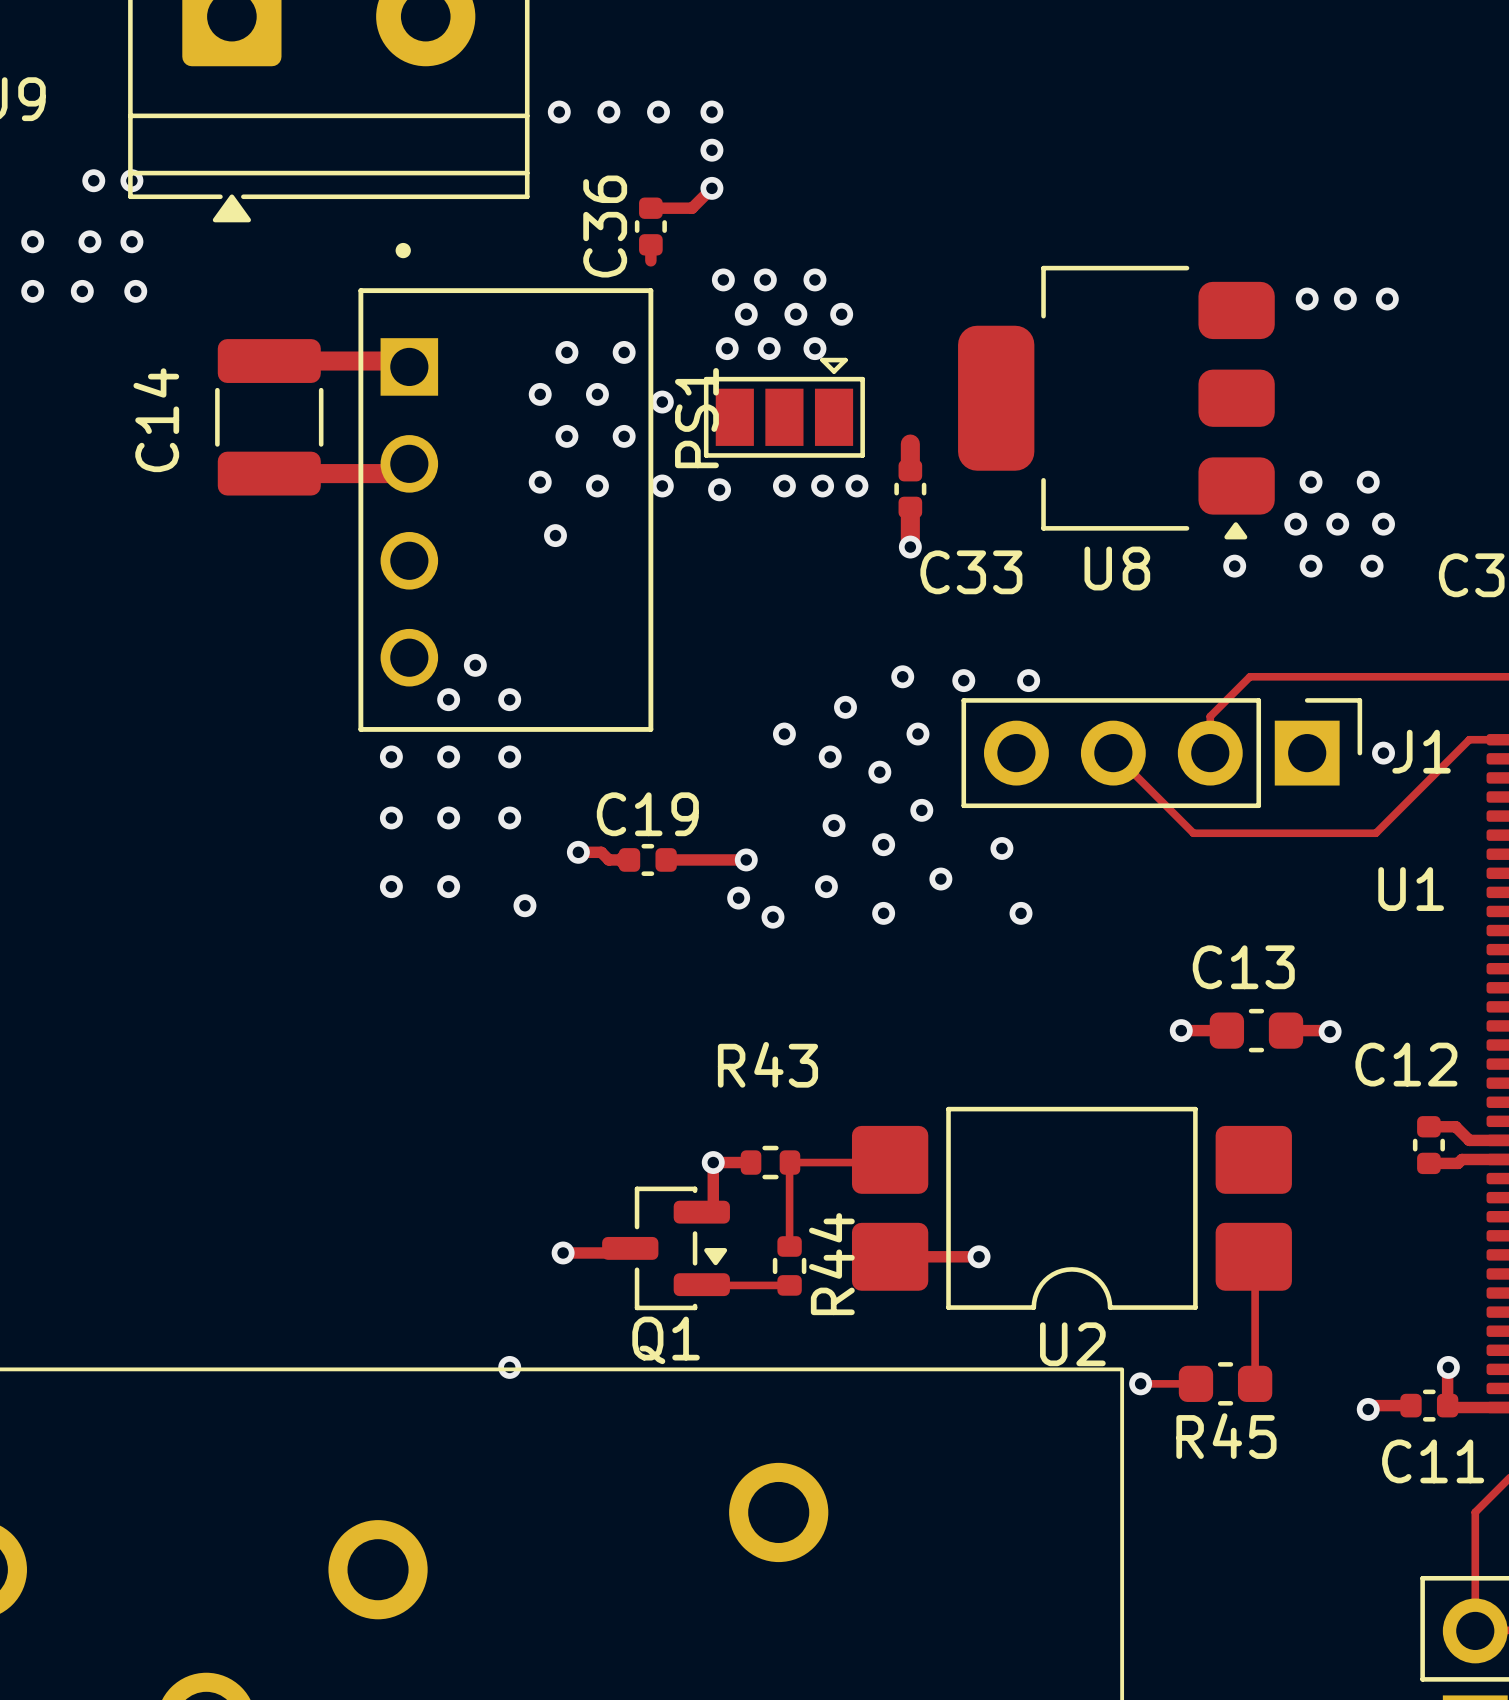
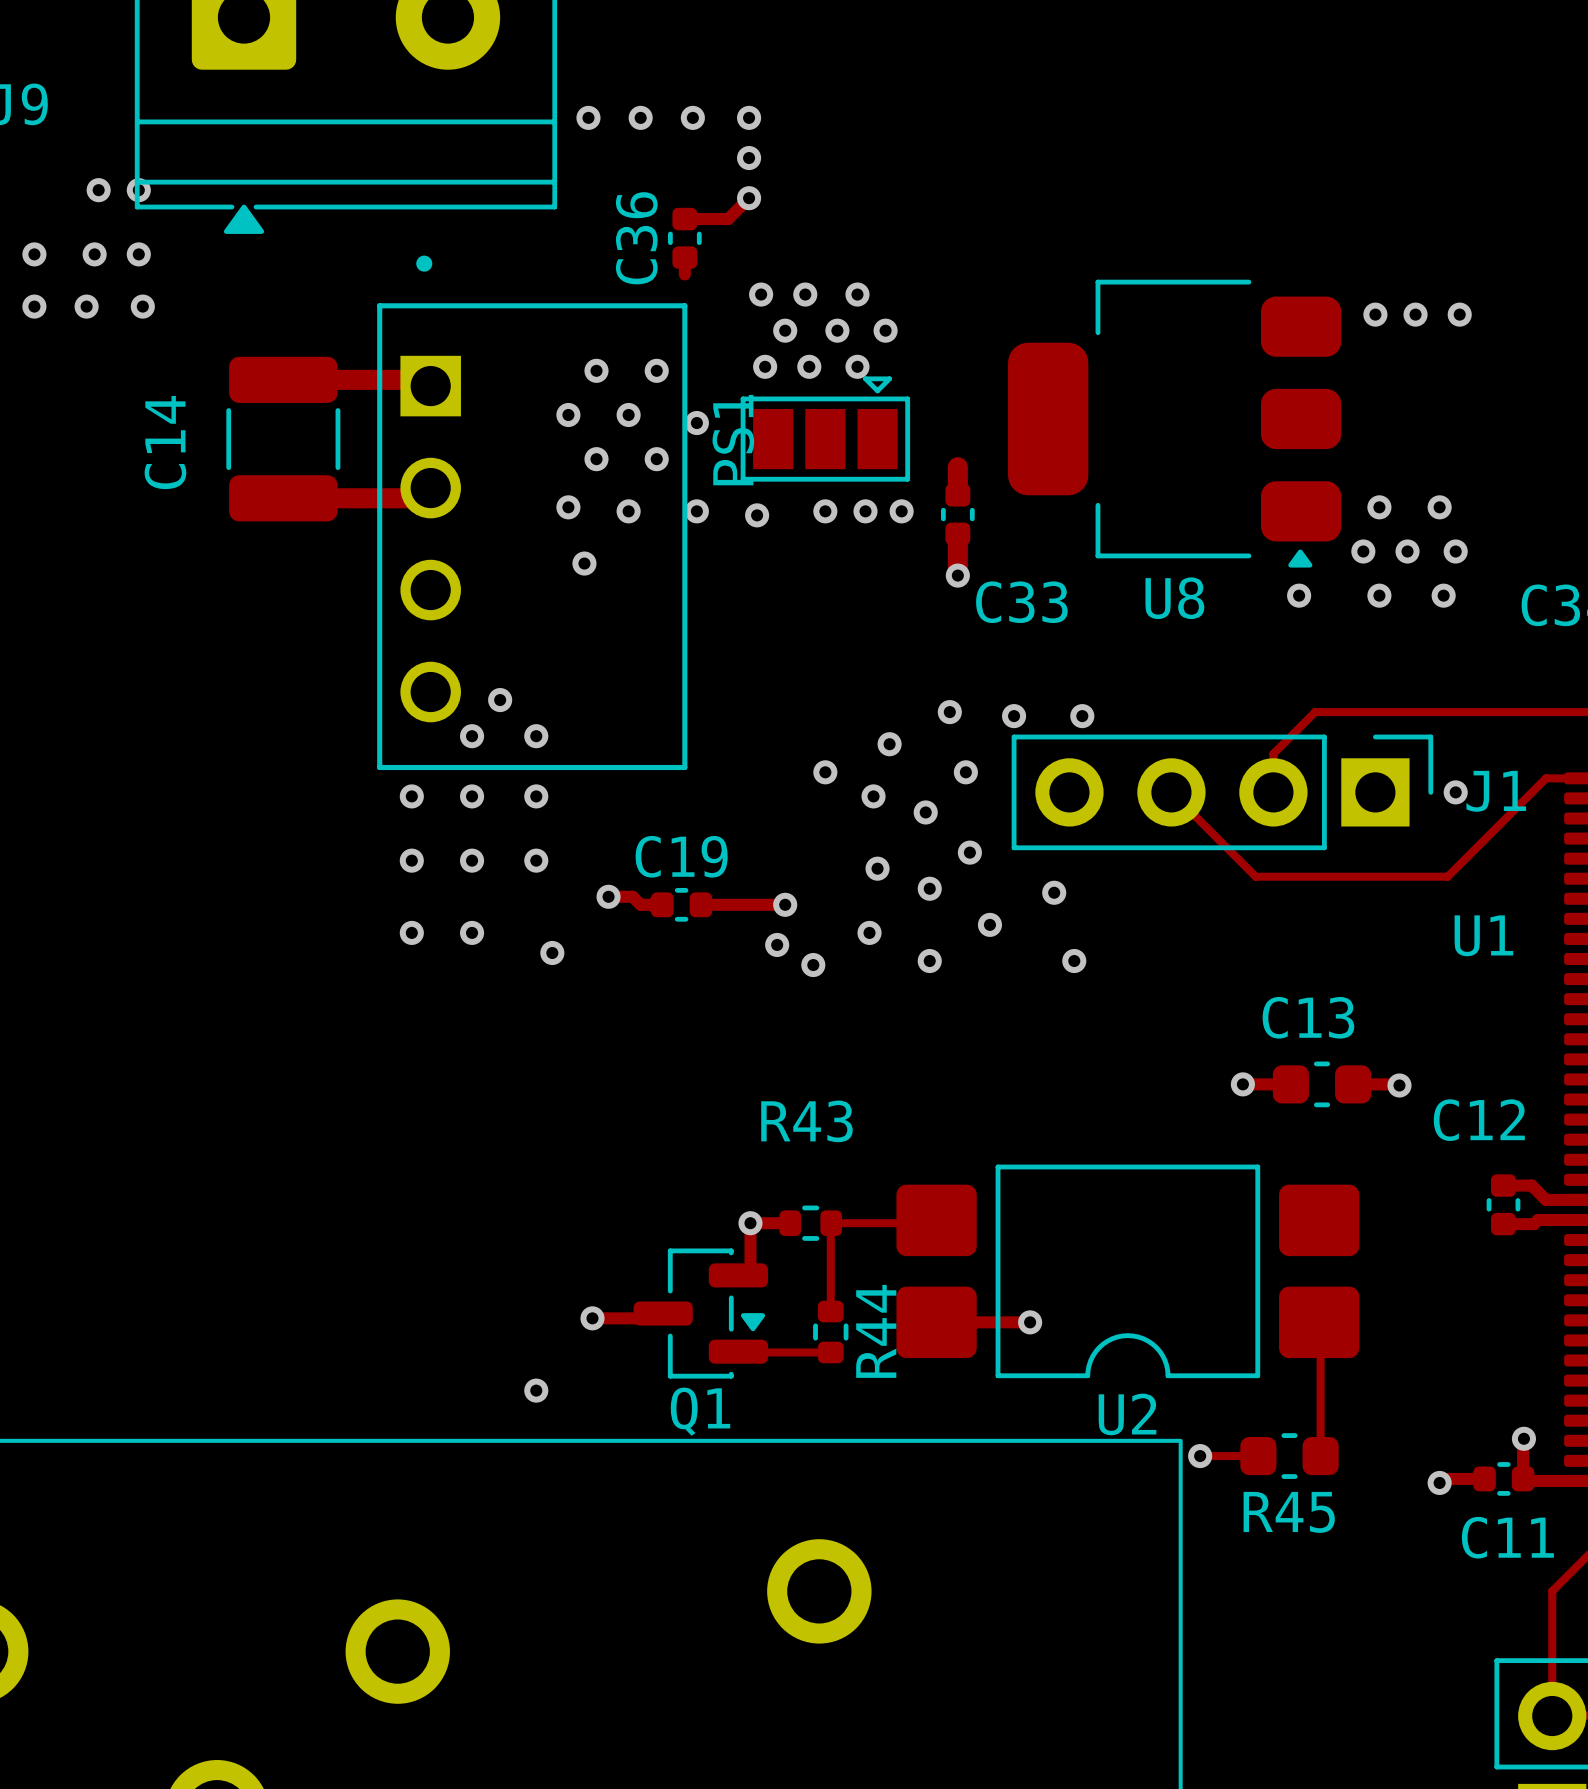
via position: (509, 1367) -> (536, 1390)

